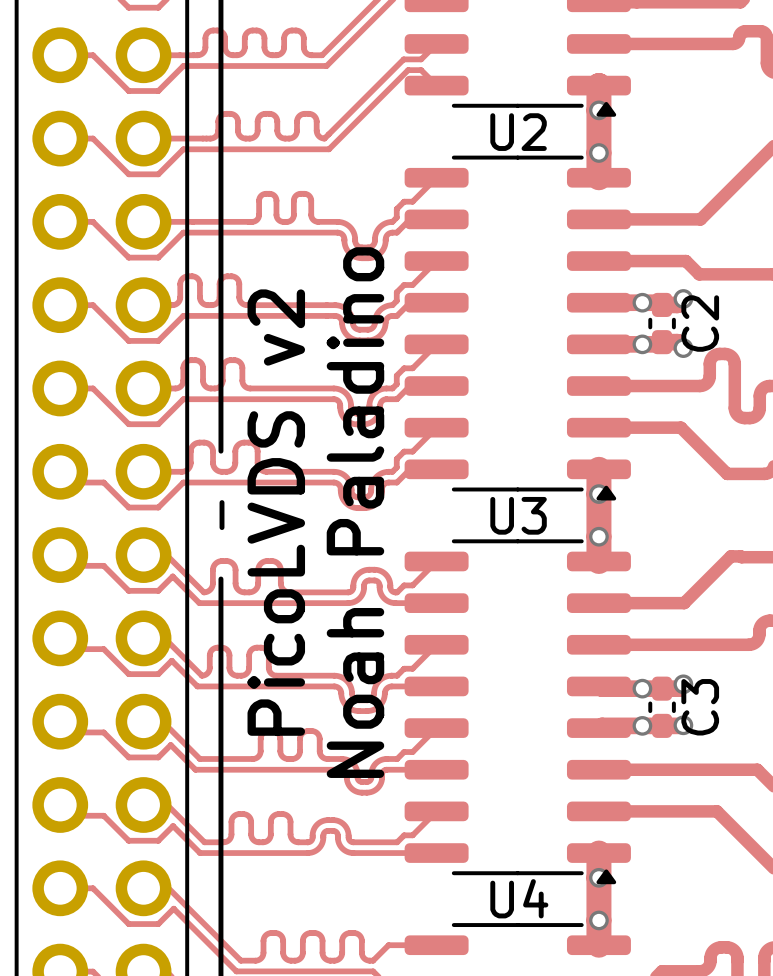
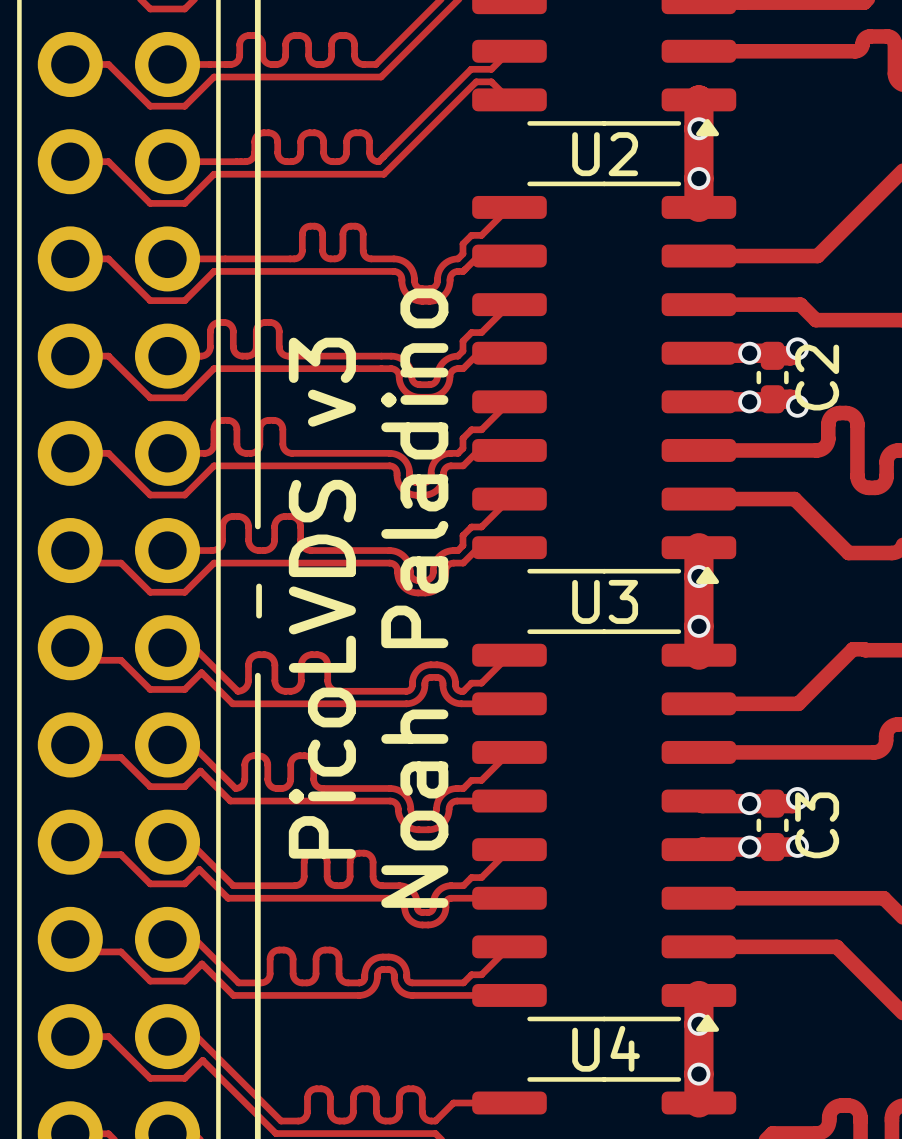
text: PicoLVDS v2 (276, 512) -> PicoLVDS v3 (322, 598)

